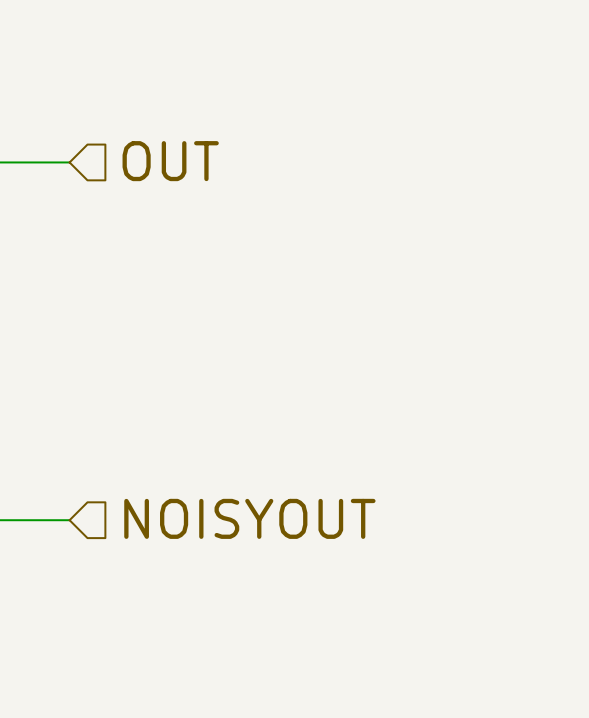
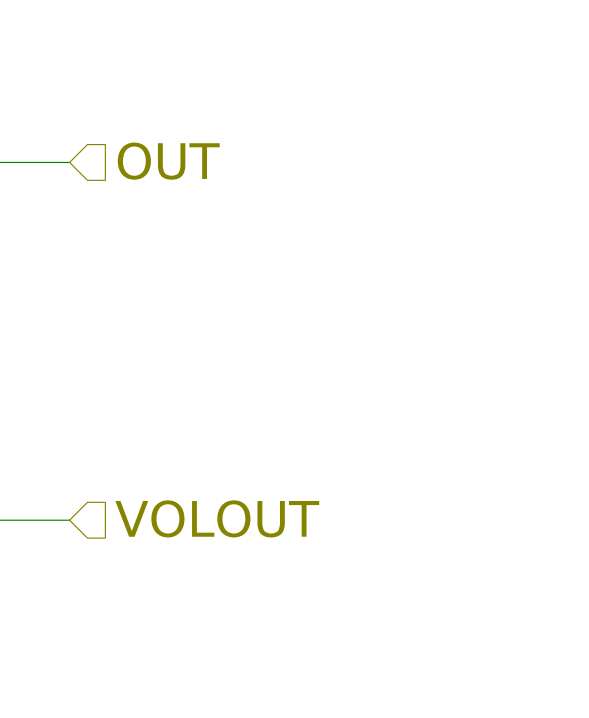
hierarchical label: NOISYOUT (249, 518) -> VOLOUT (217, 518)

